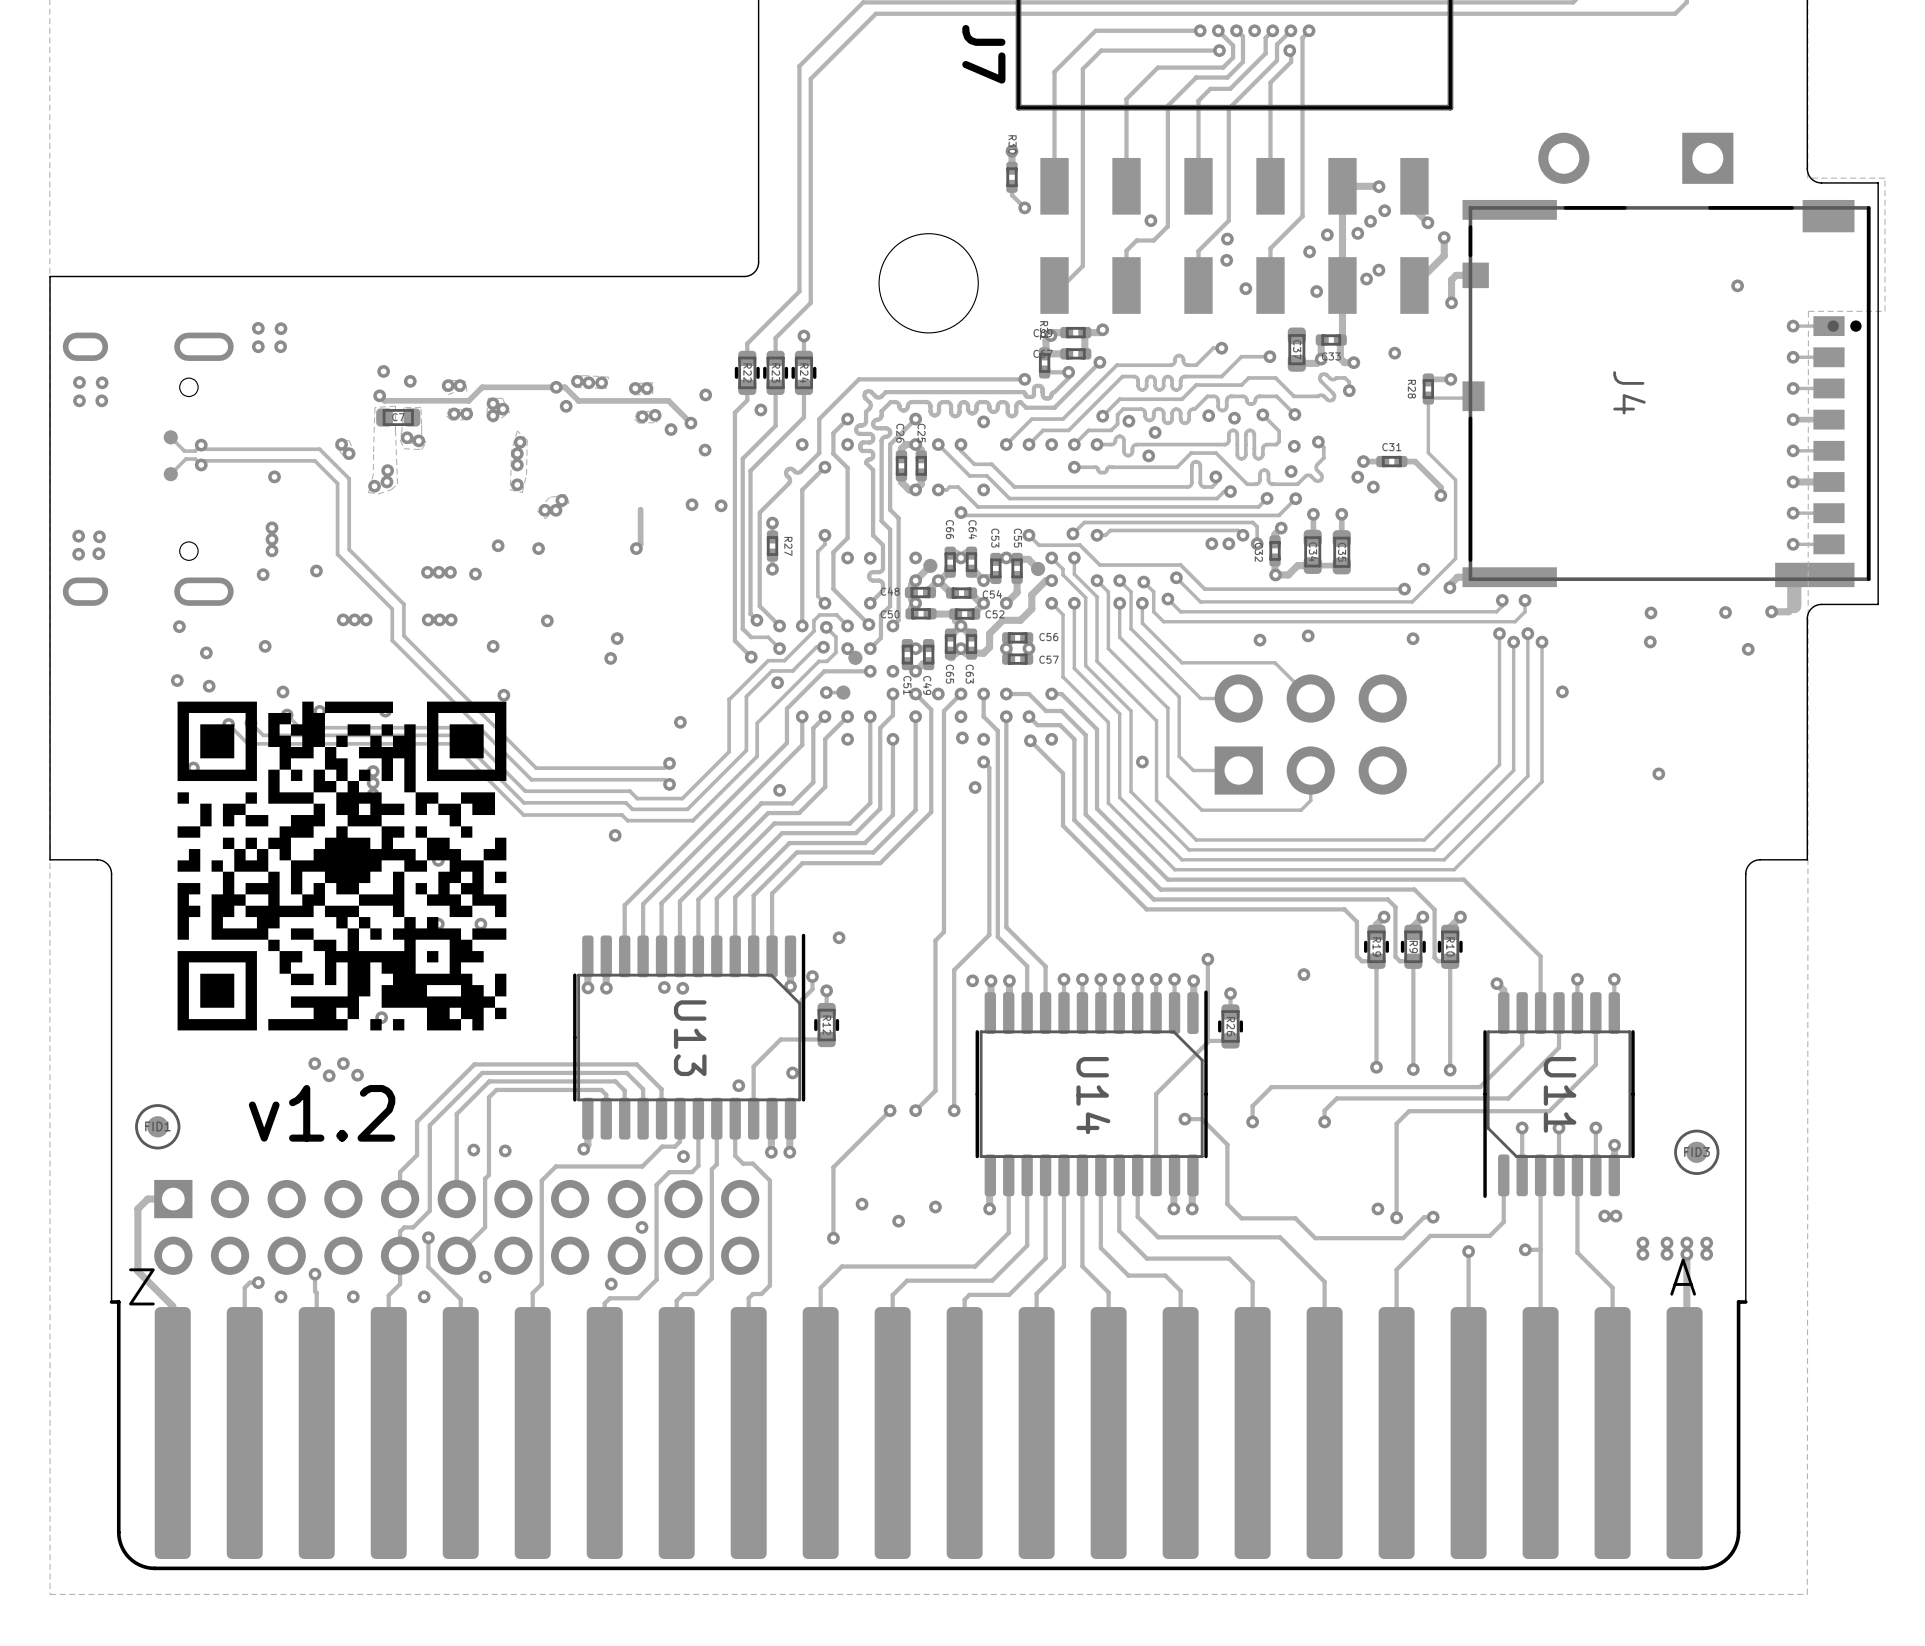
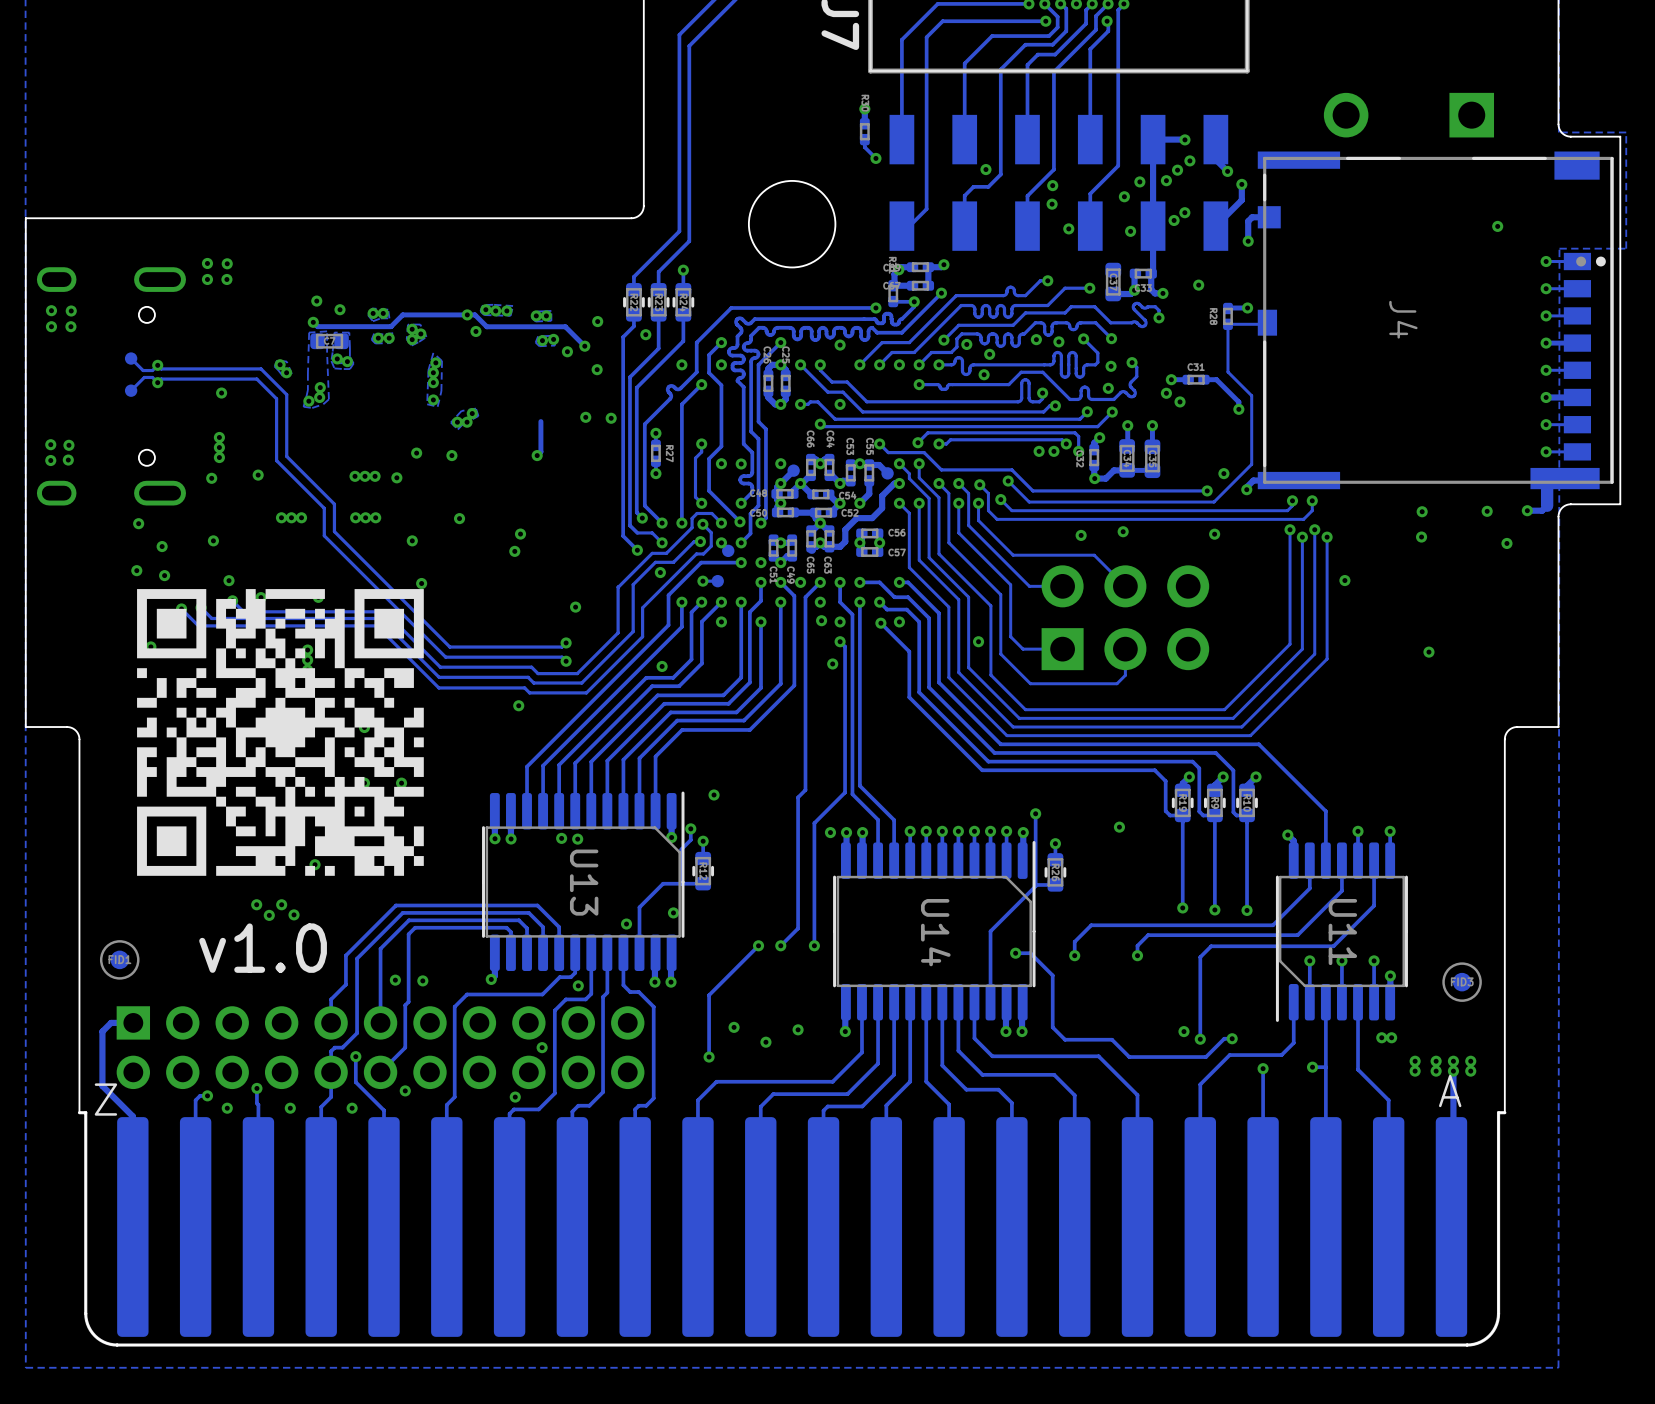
text: v1.2 (322, 1113) -> v1.0 (263, 948)

